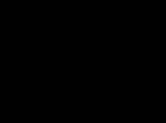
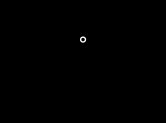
hole: none -> (83, 39)

